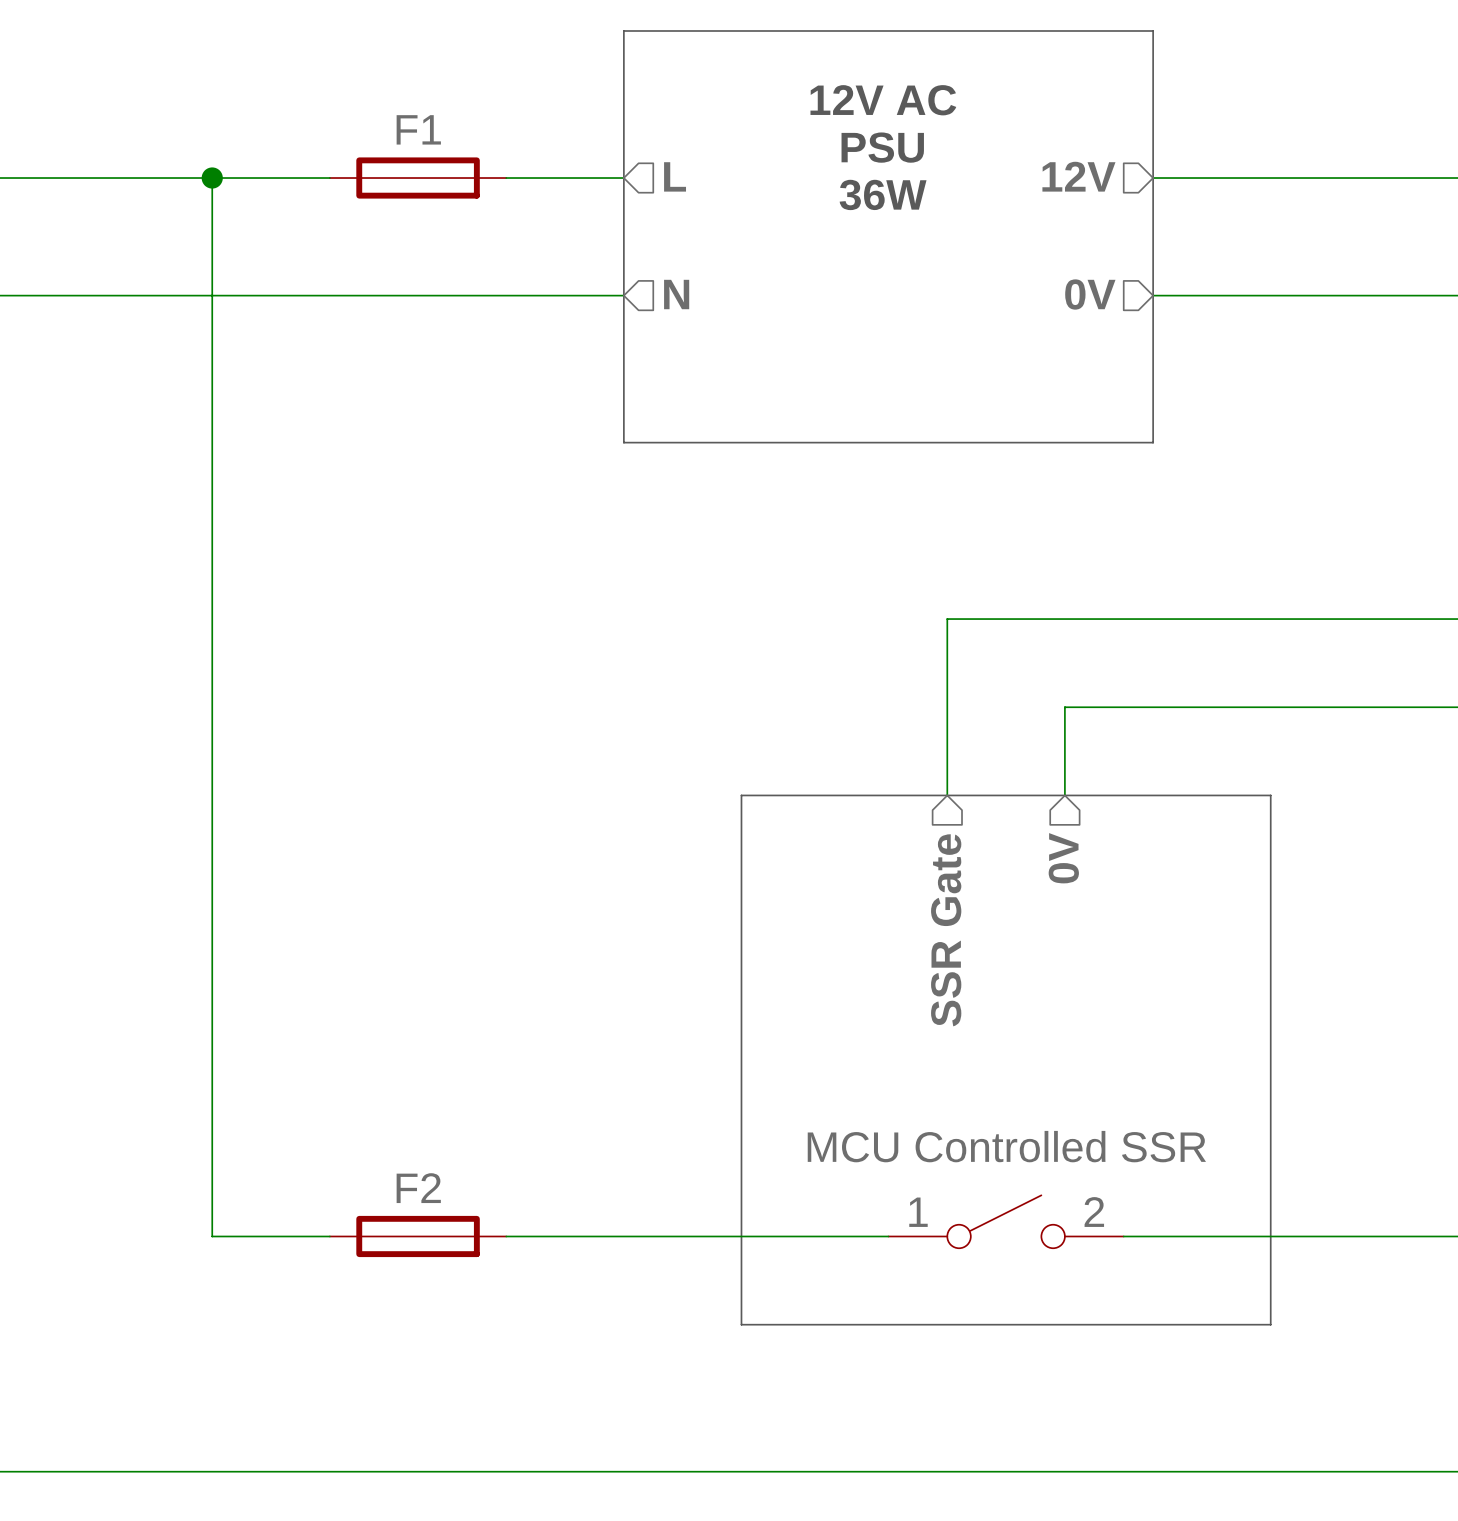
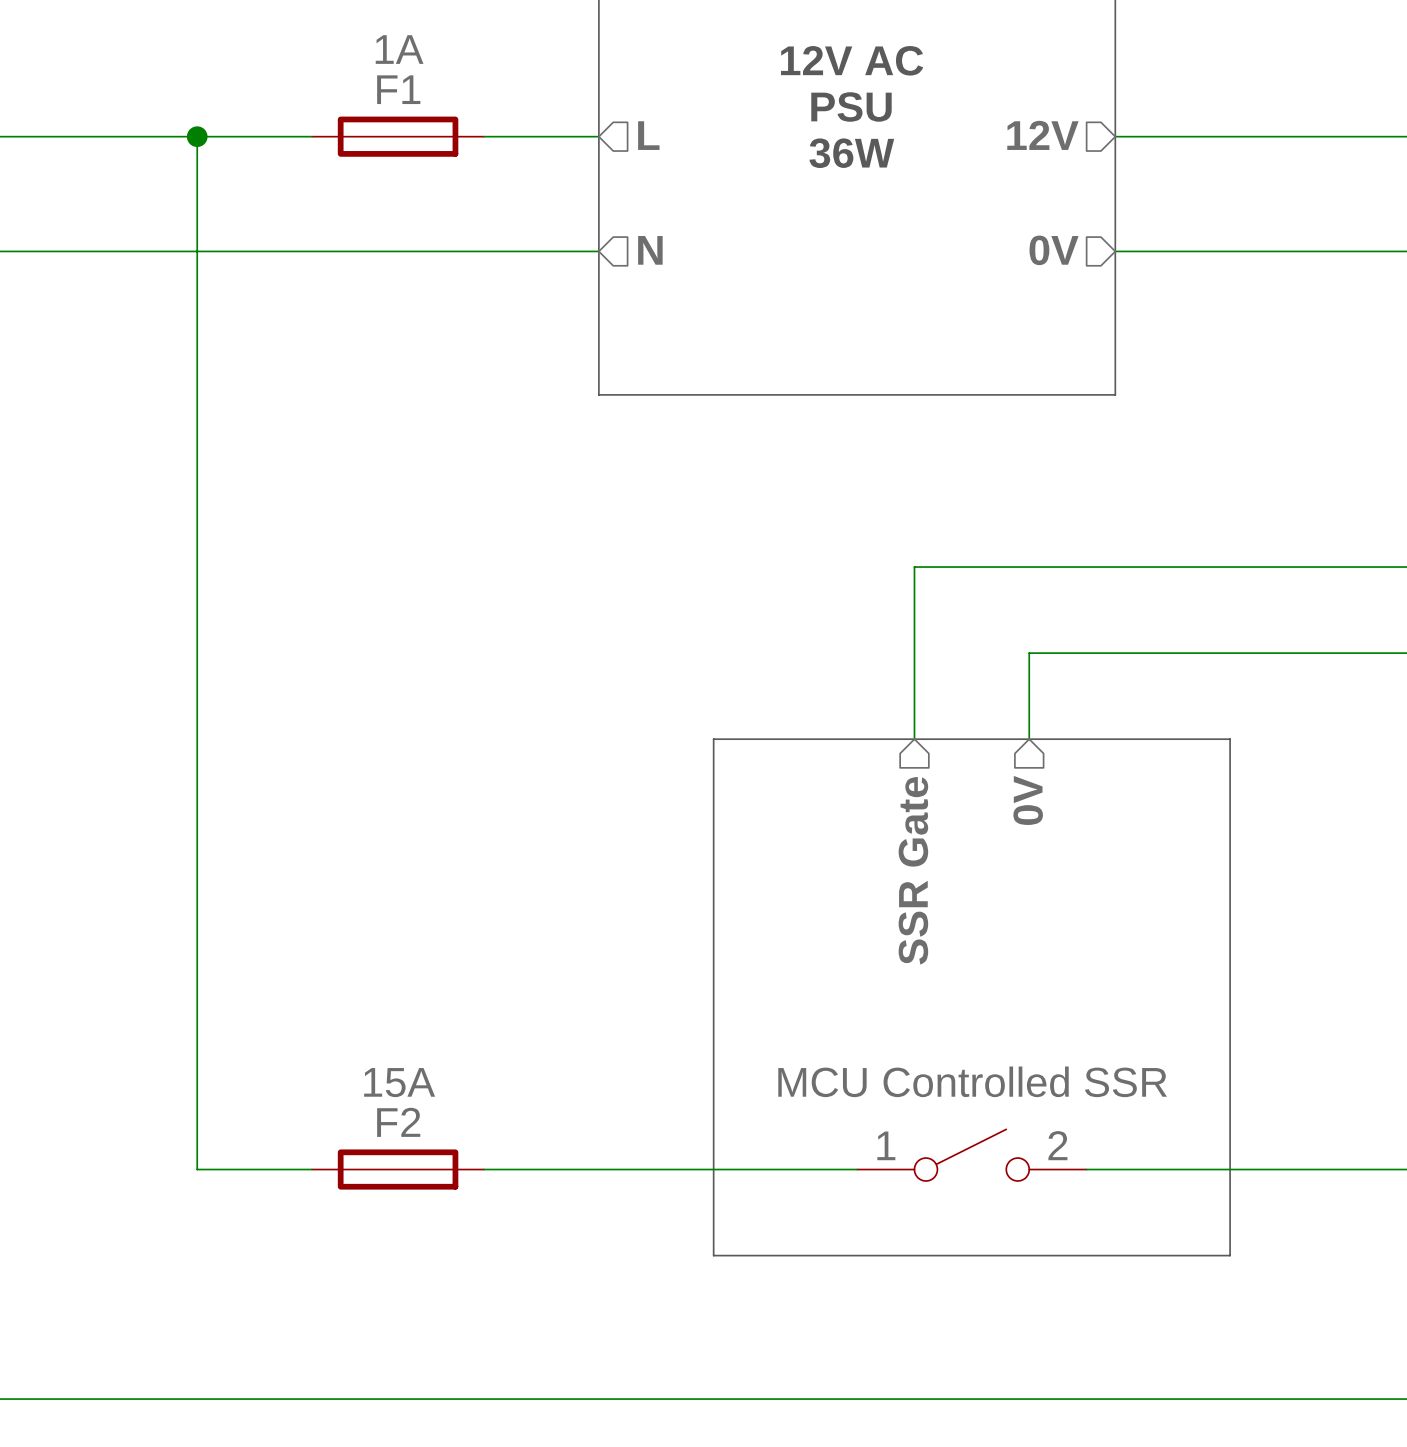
F1 value: none -> 1A (399, 49)
F2 value: none -> 15A (399, 1082)

